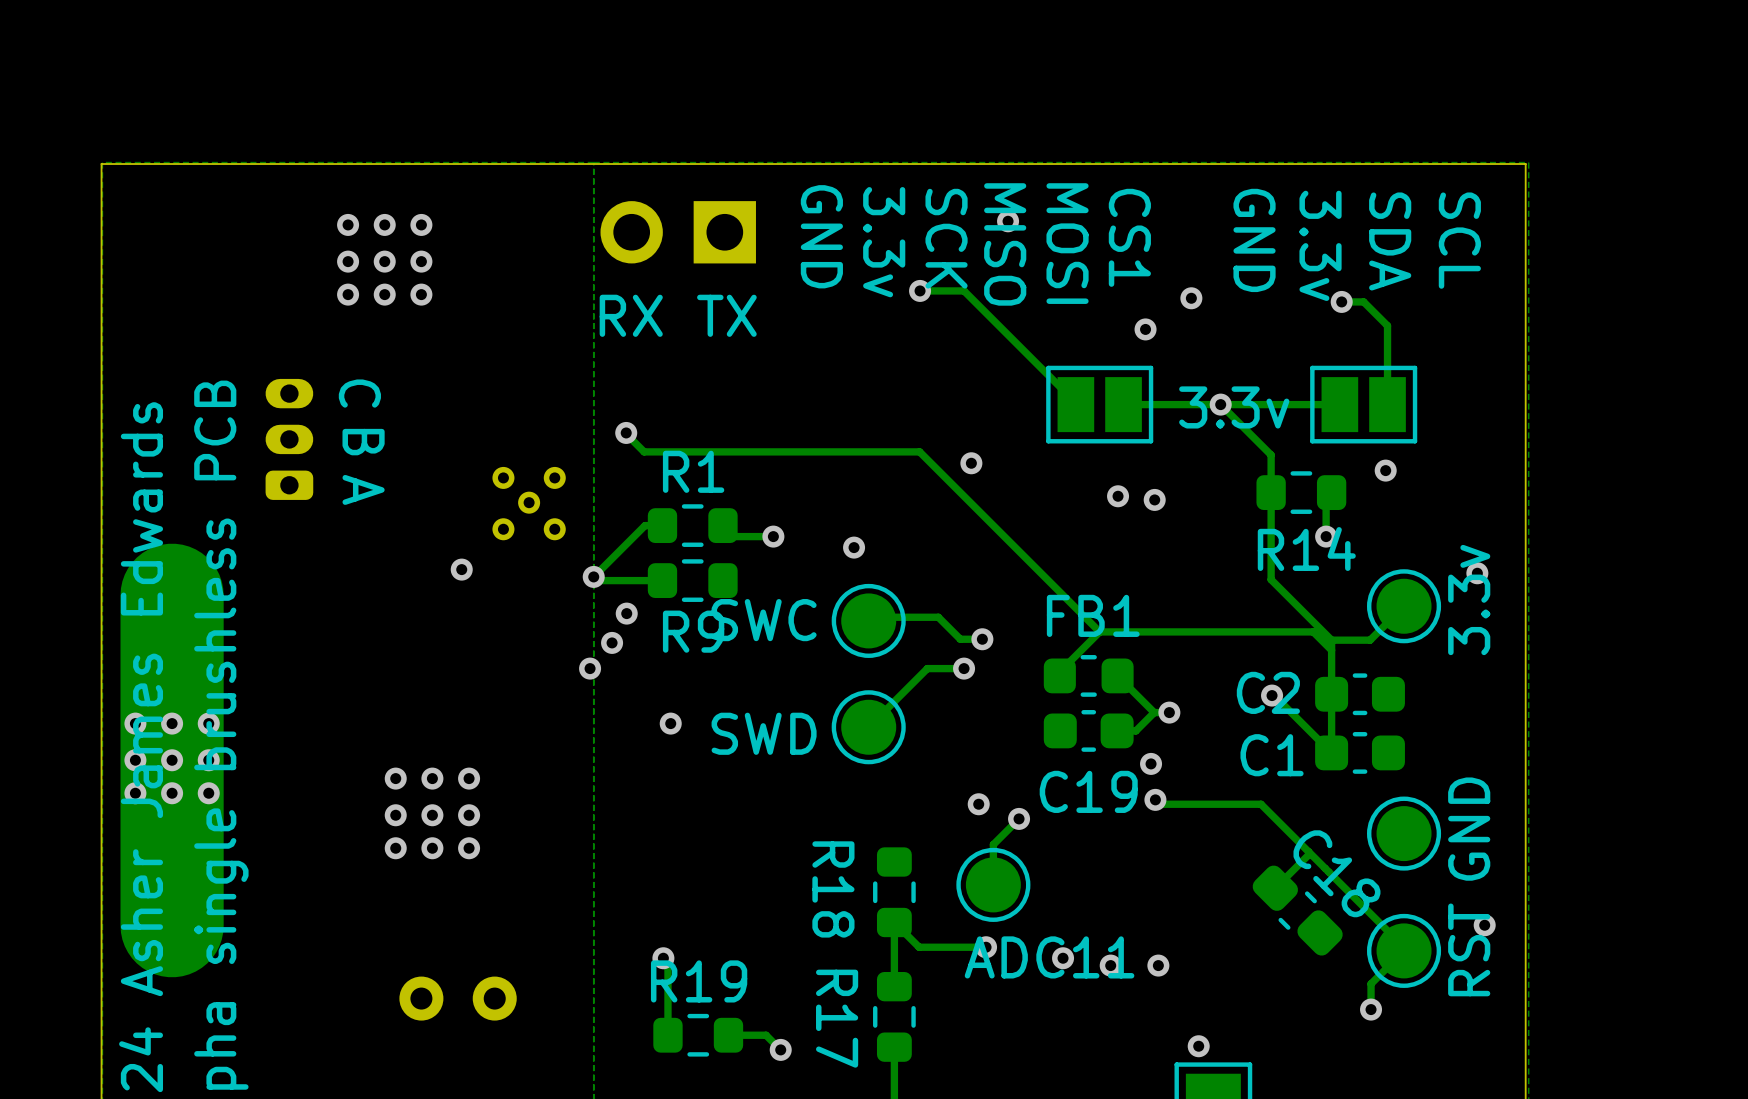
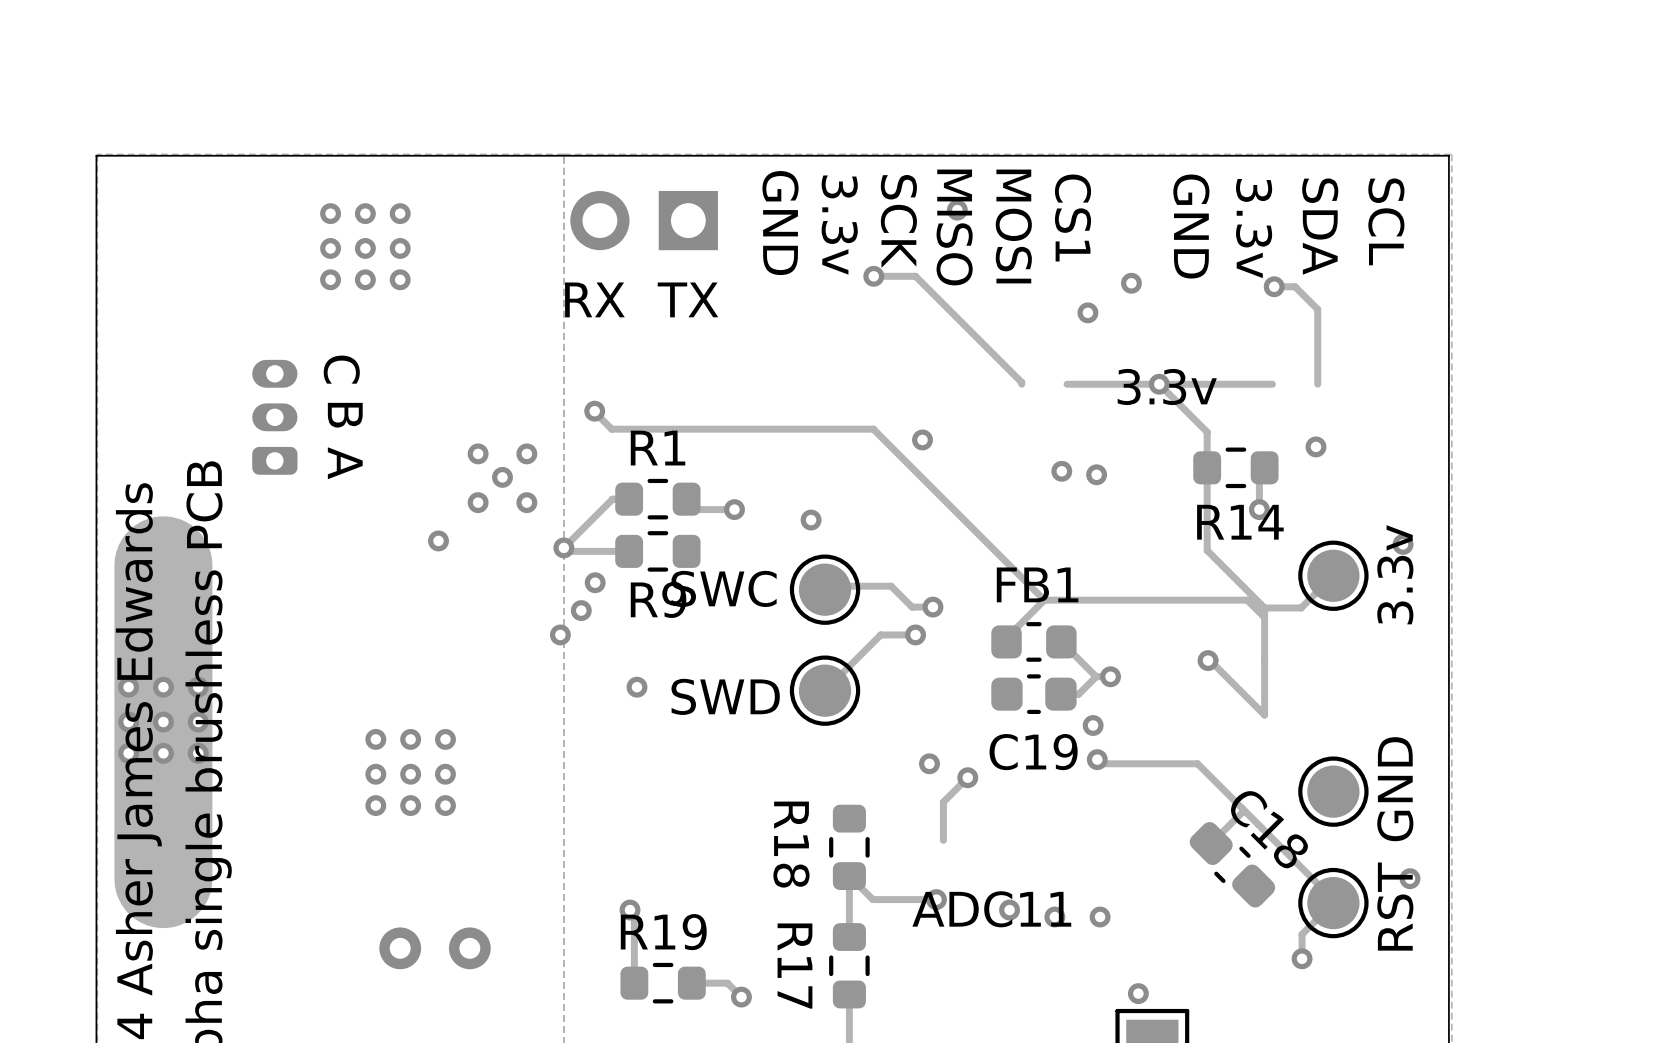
part: (1099, 404) -> none
part: (1363, 404) -> none
C2: (1360, 694) -> none
C1: (1360, 752) -> none
part: (993, 884) -> none

